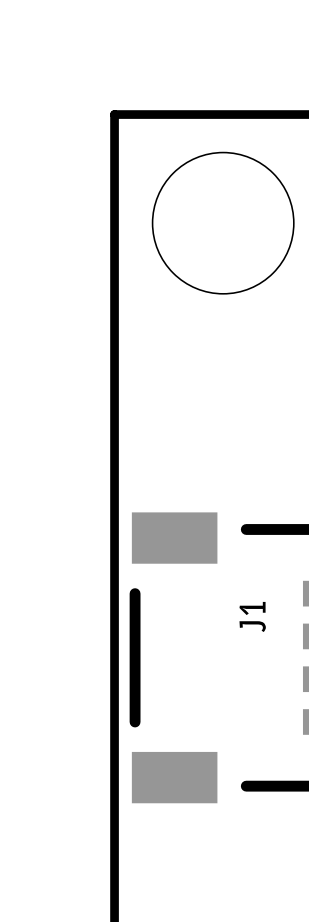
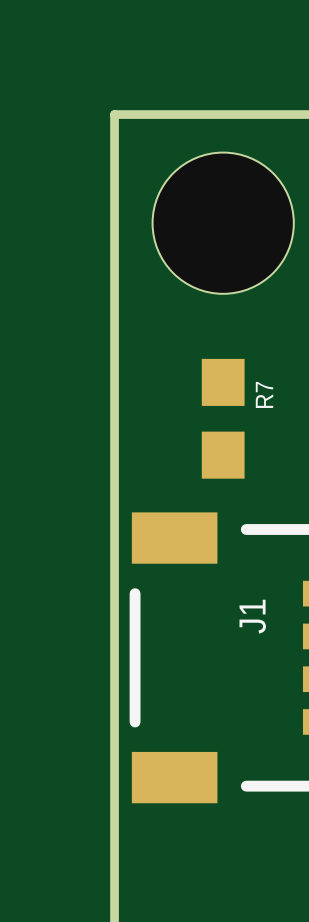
R7: none -> (223, 418)

